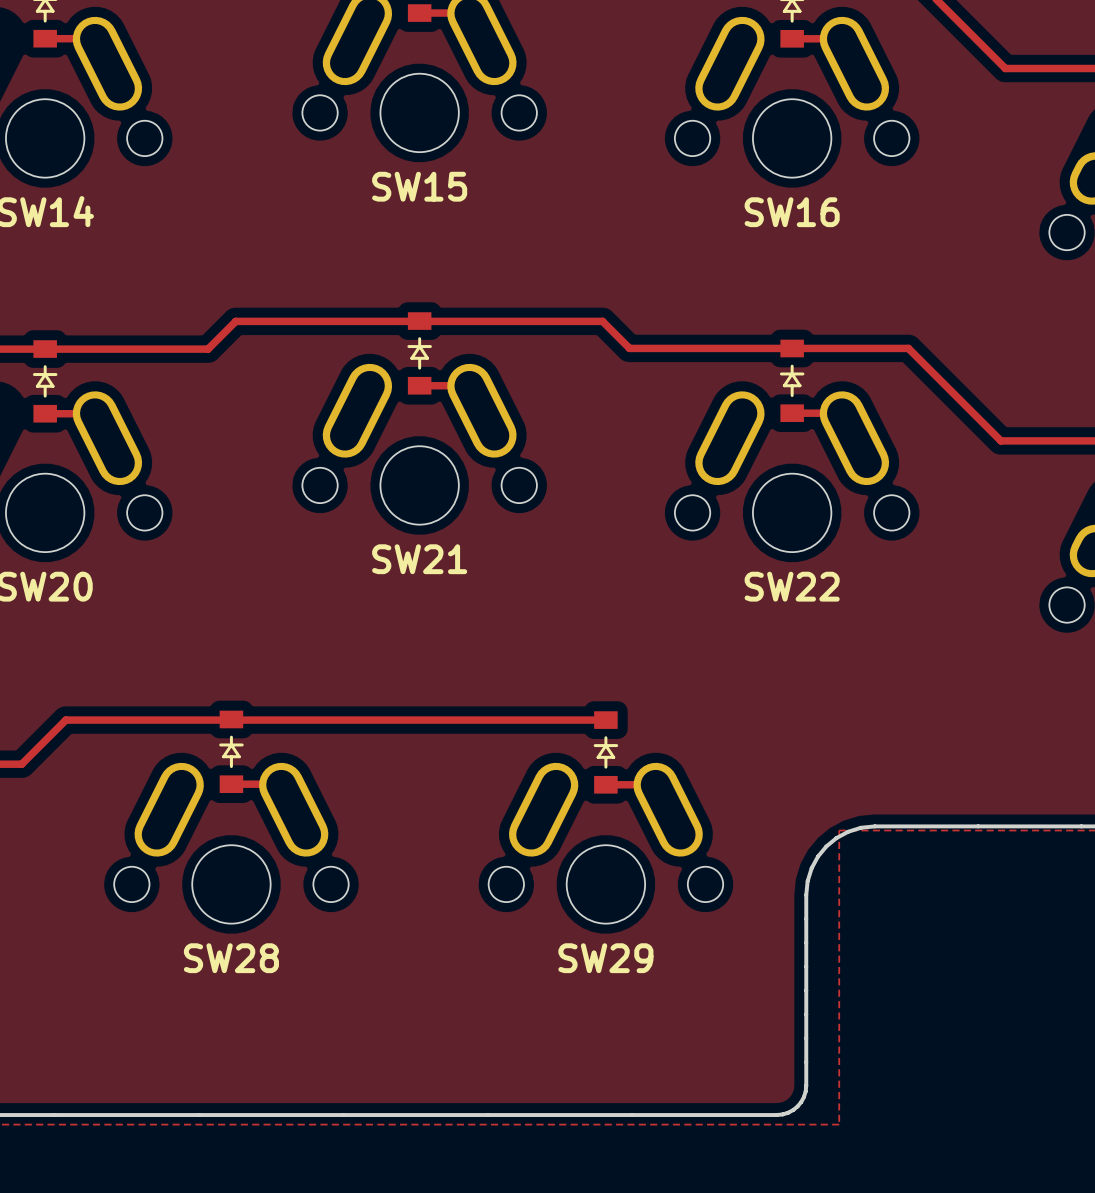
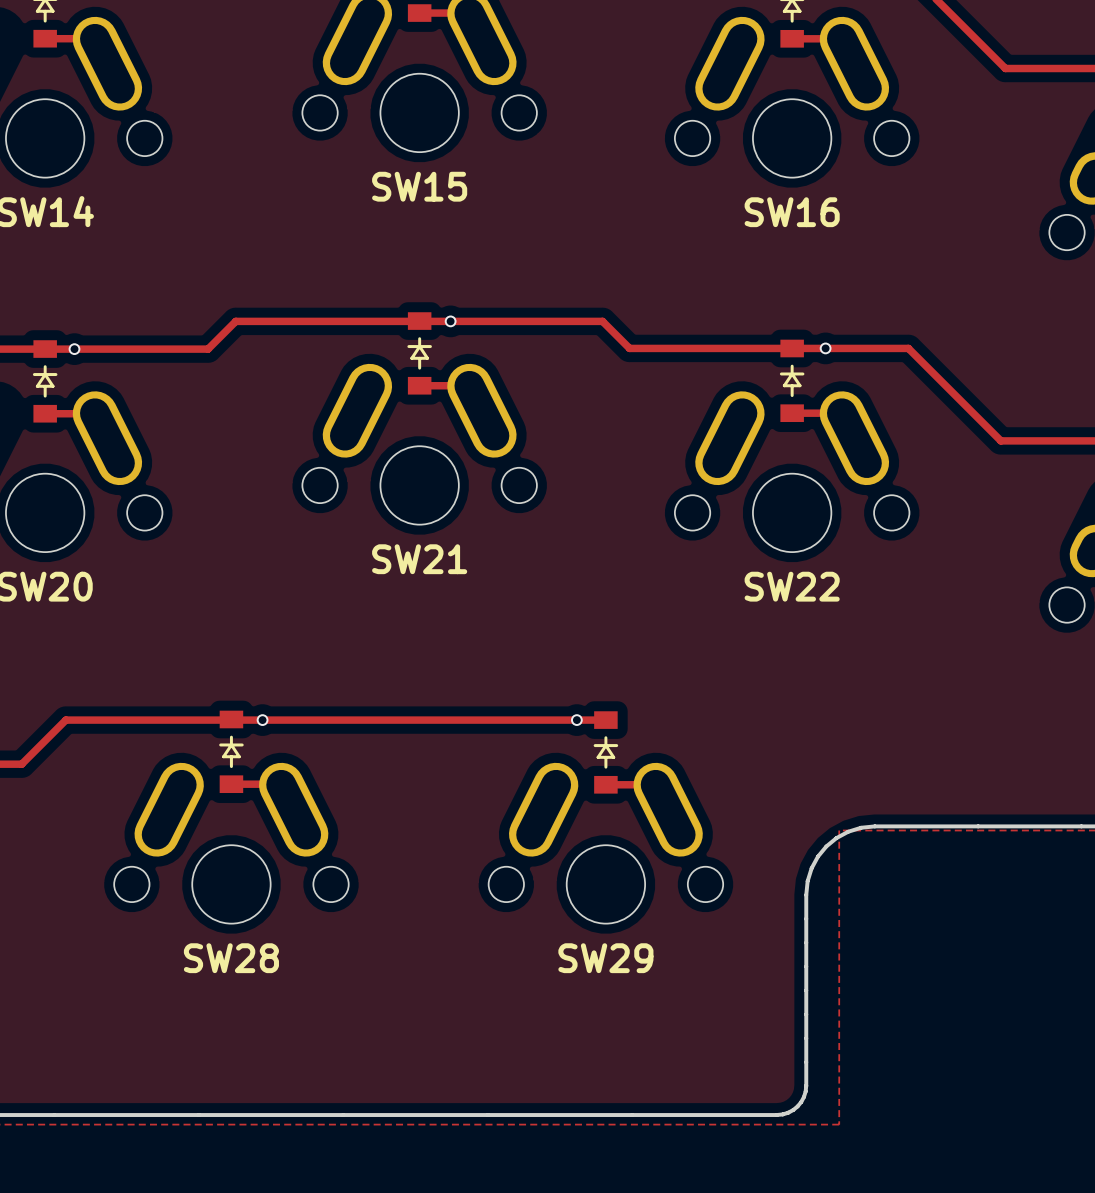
via: none -> (450, 321)
via: none -> (825, 348)
via: none -> (74, 349)
via: none -> (262, 720)
via: none -> (576, 720)

